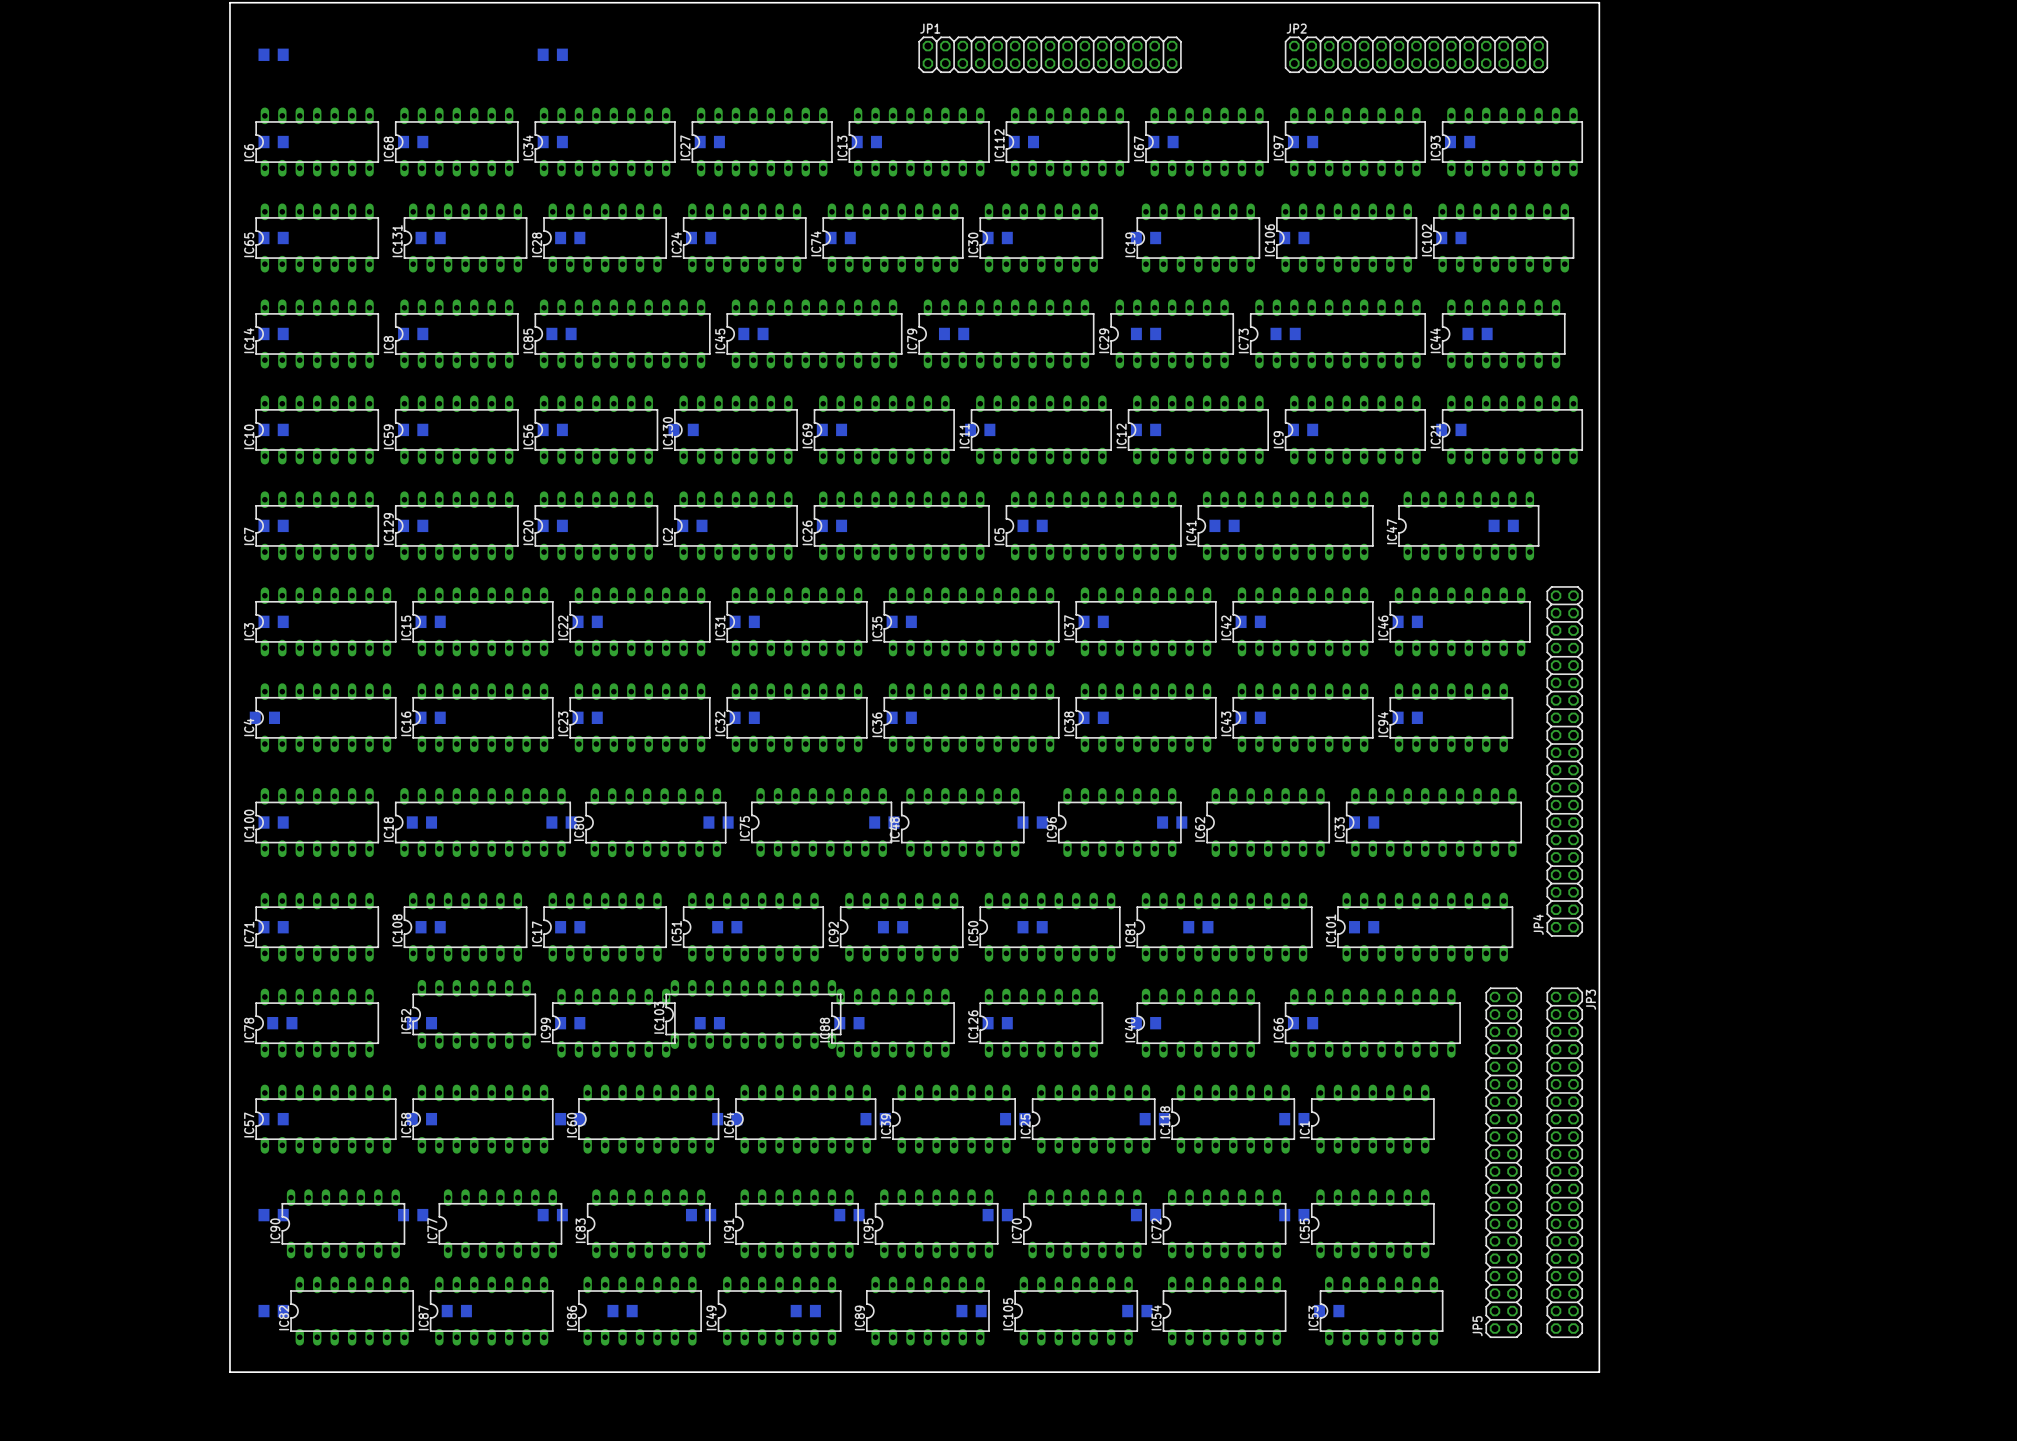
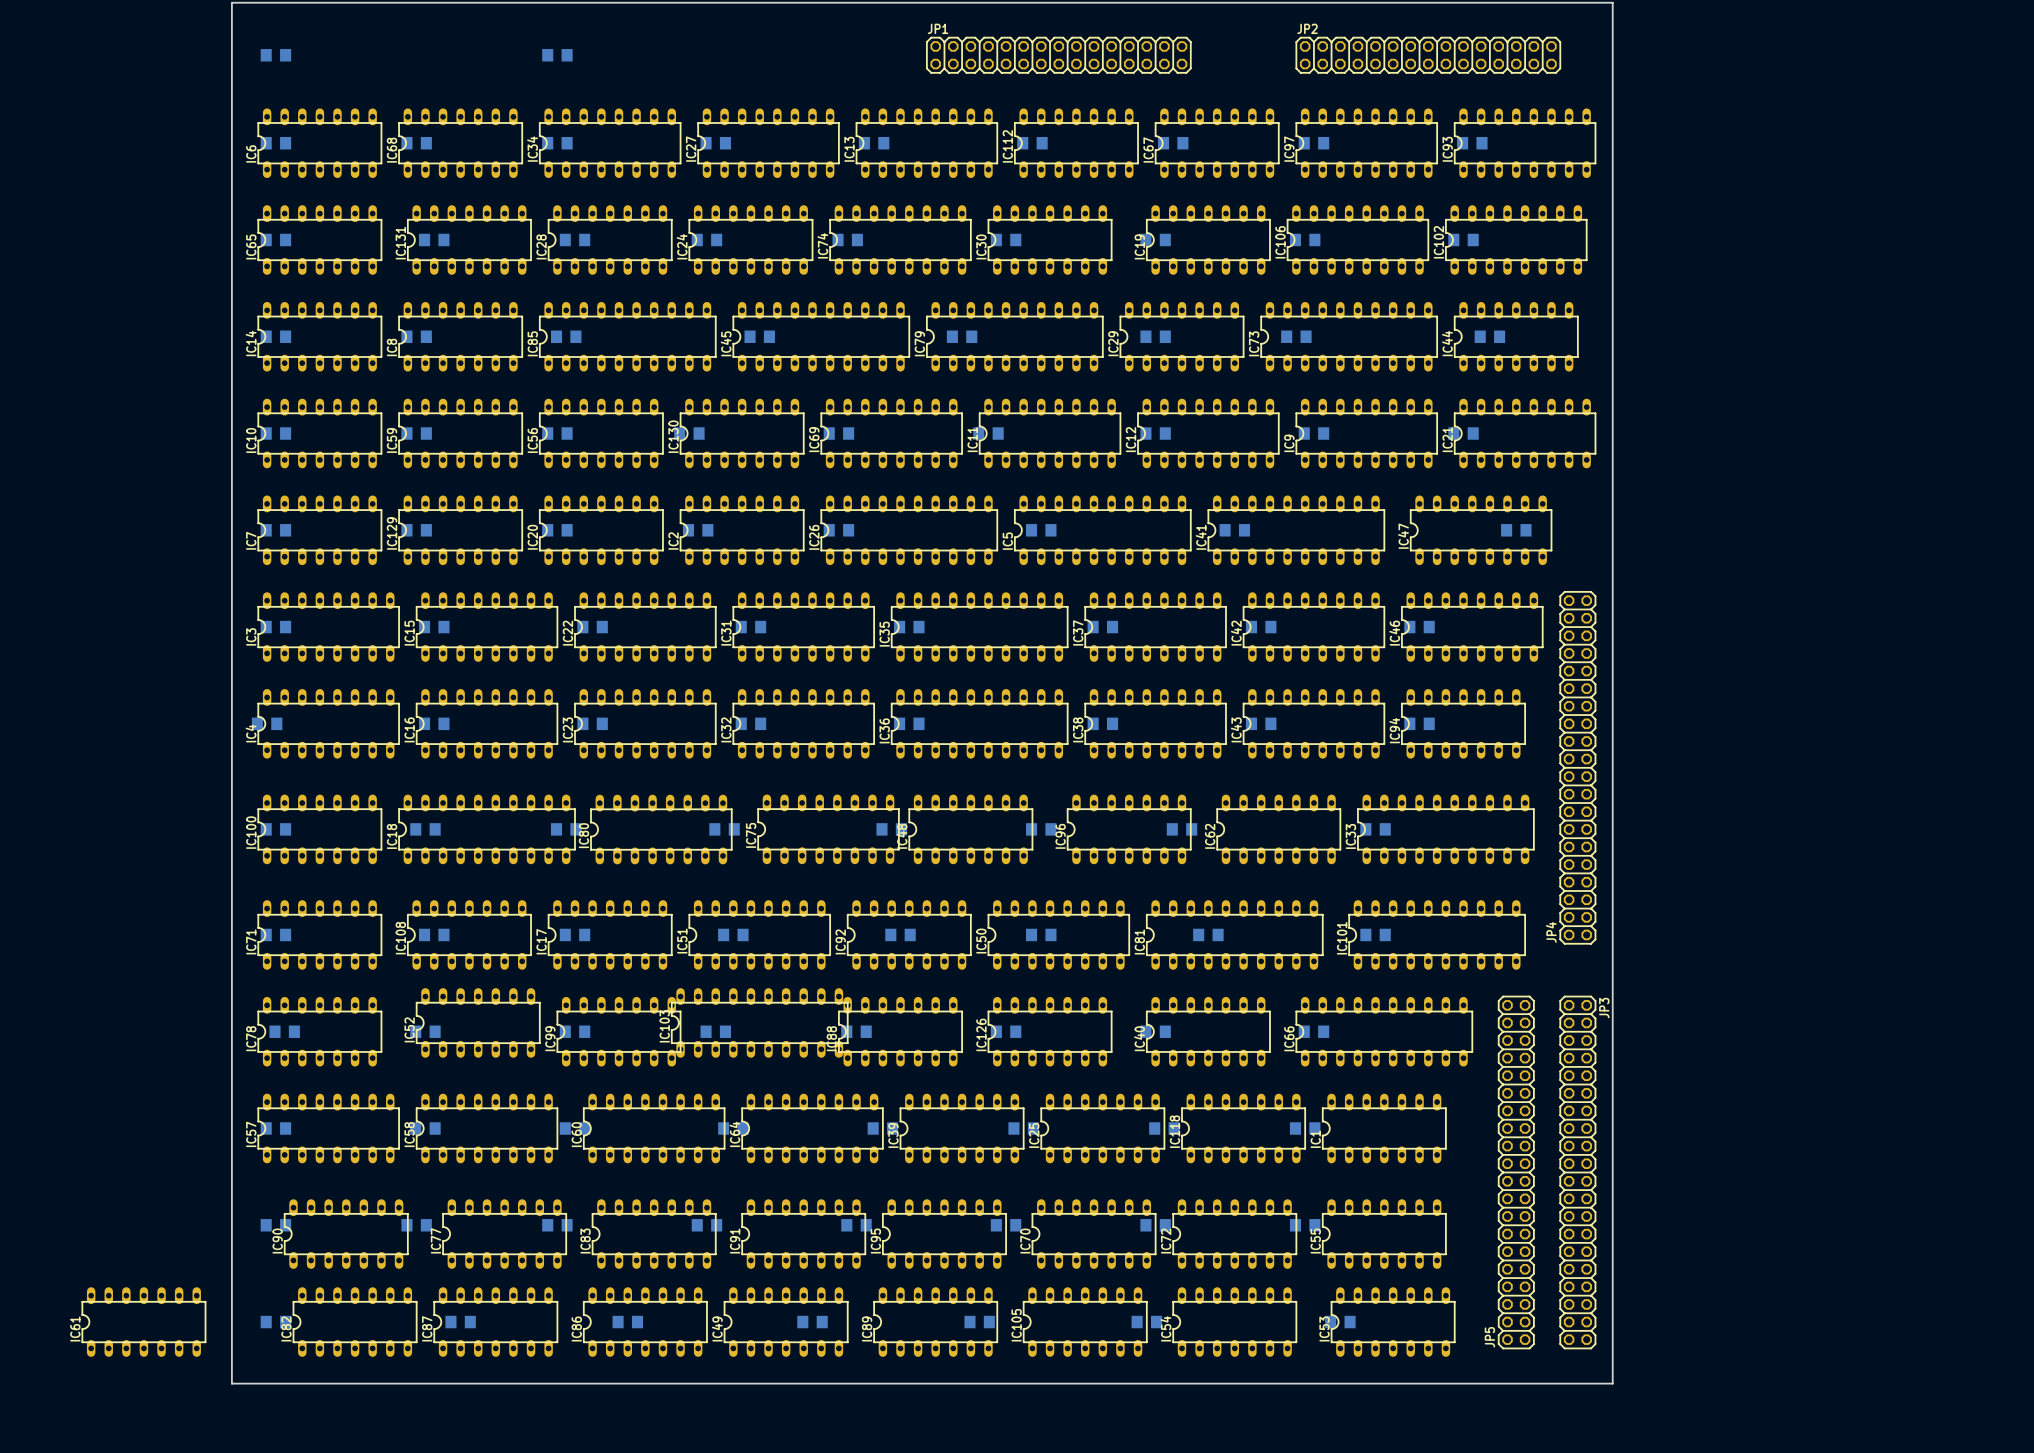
IC61: none -> (143, 1322)

